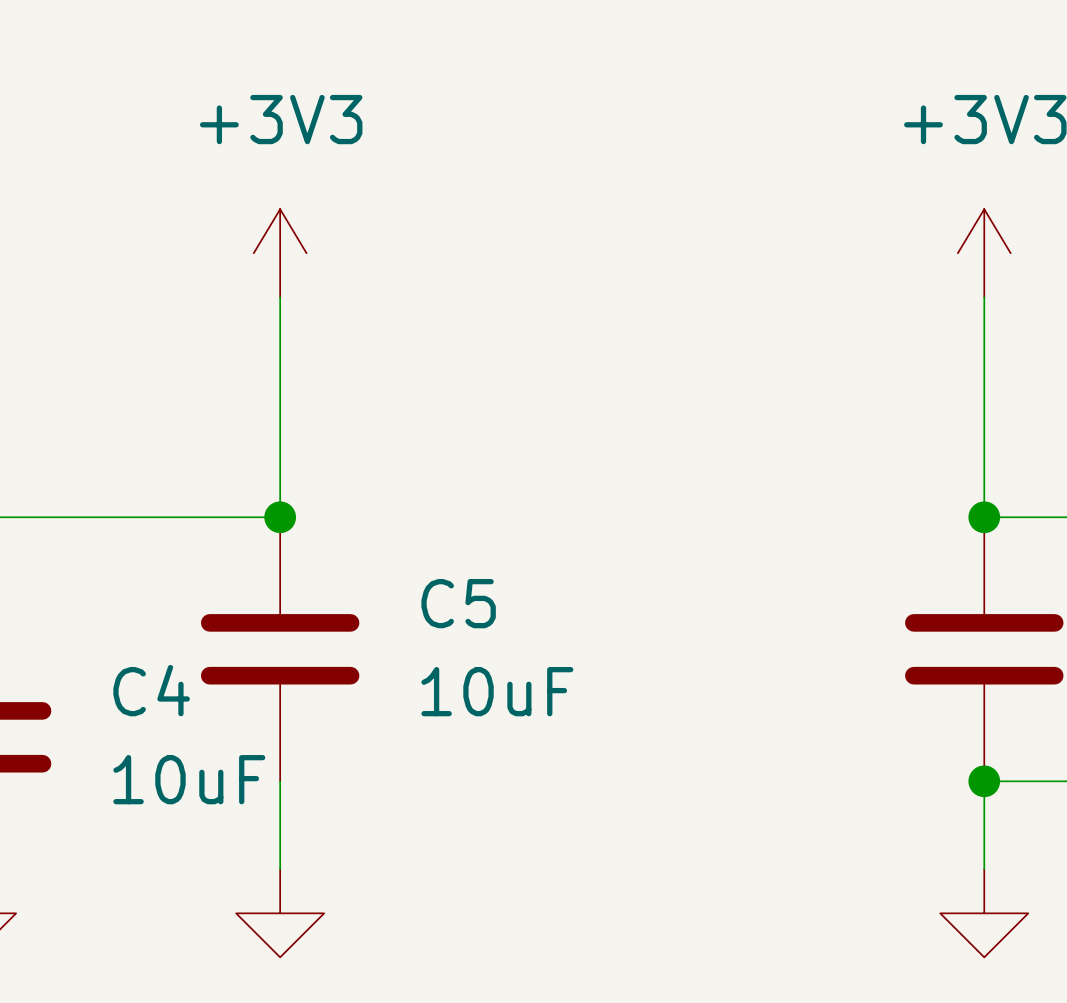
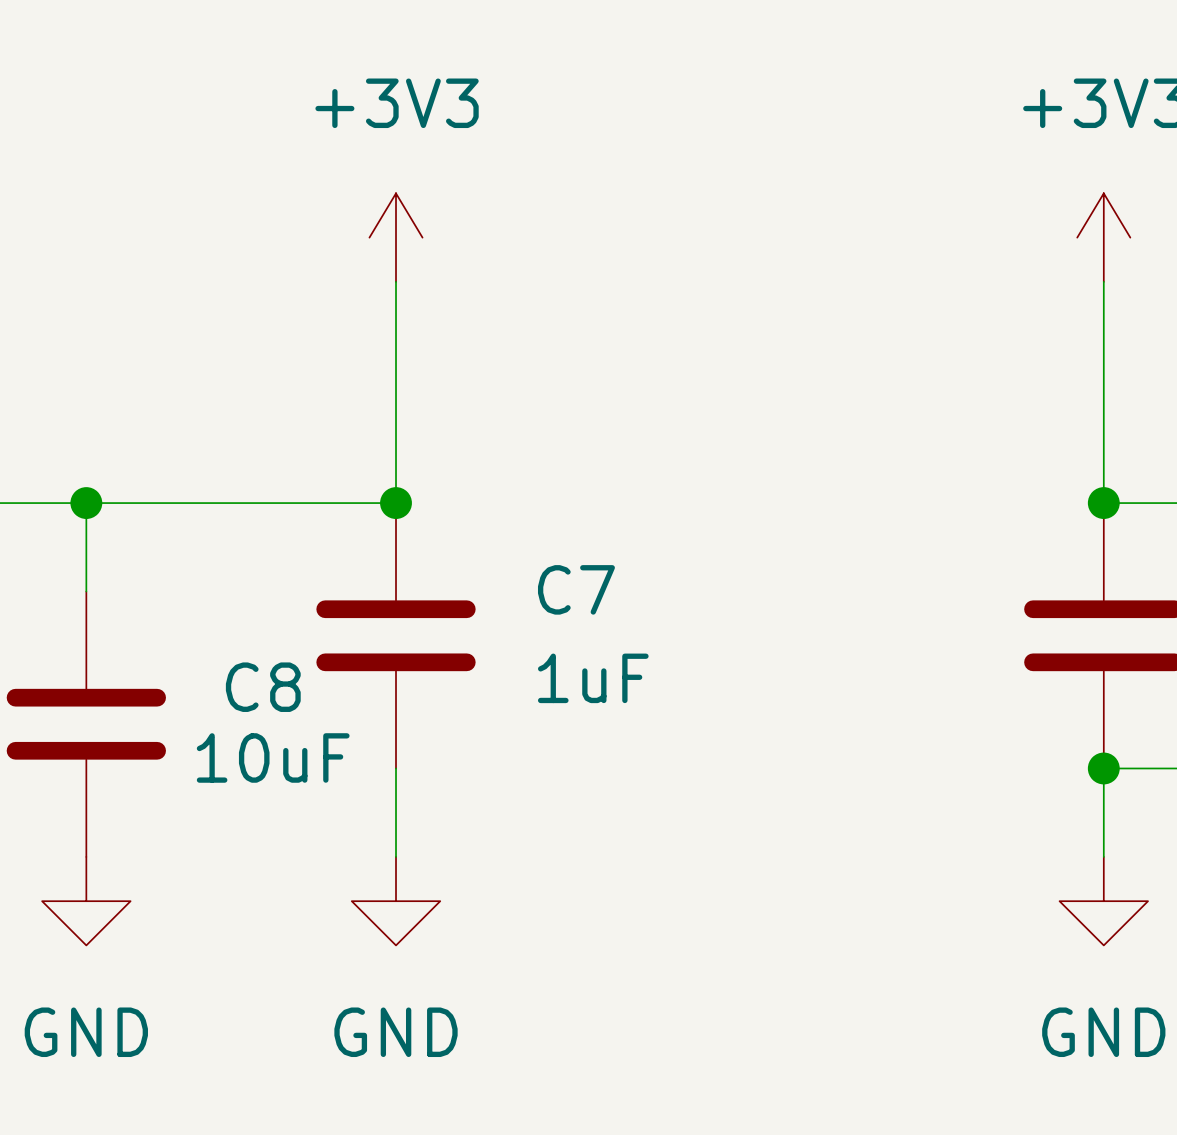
C5 name: C5 (458, 603) -> C7 (576, 589)
C4 name: C4 (151, 690) -> C8 (263, 687)
C5 value: 10uF (497, 691) -> 1uF (593, 678)
C4 value position: 10uF (189, 779) -> 10uF (273, 757)

